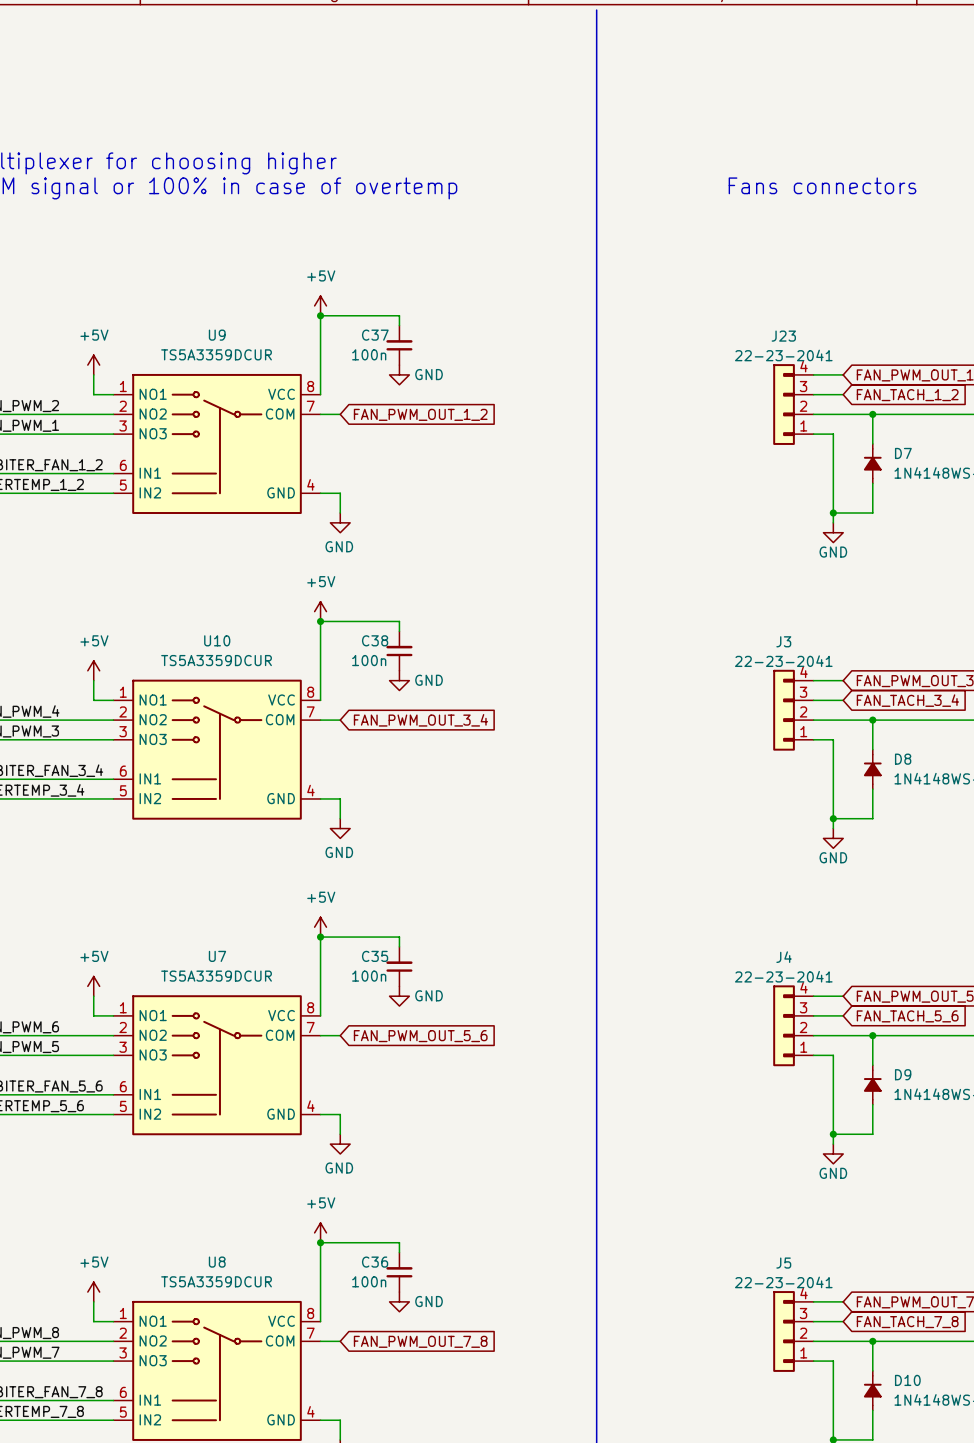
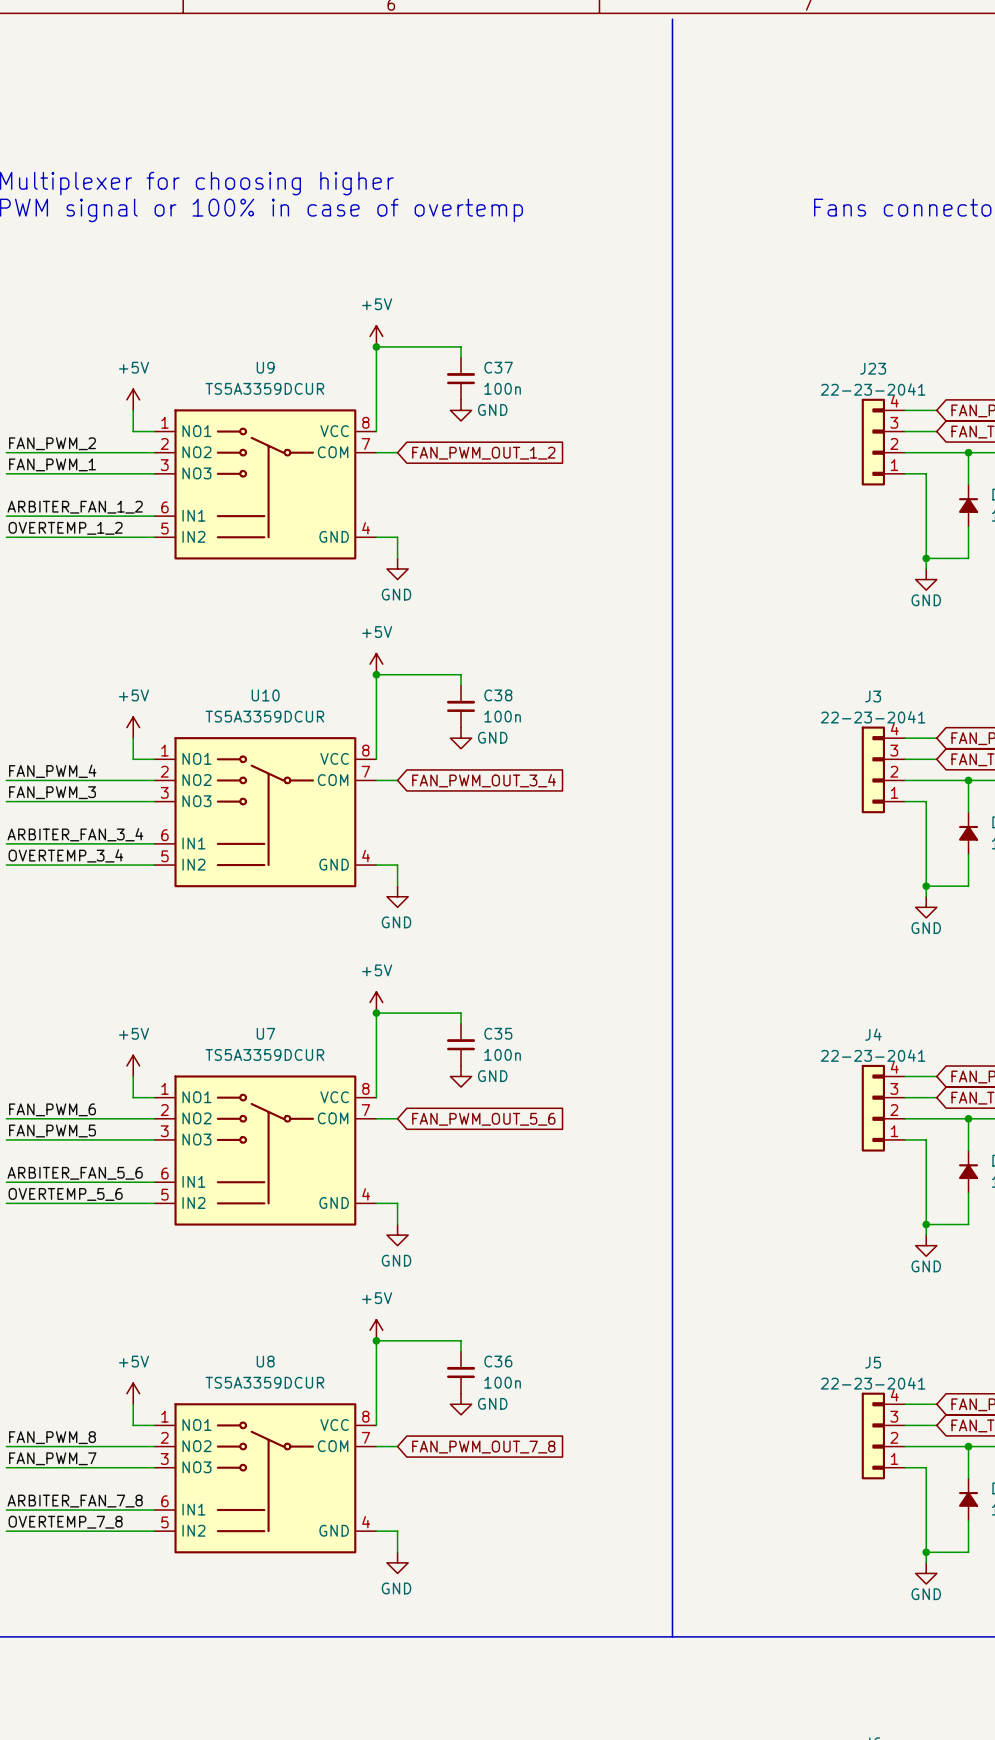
C37 name position: C37 (375, 335) -> C37 (498, 367)
C37 text position: 100n (369, 354) -> 100n (502, 388)
C38 name position: C38 (375, 640) -> C38 (498, 695)
C38 text position: 100n (369, 660) -> 100n (502, 716)
C35 name position: C35 (375, 956) -> C35 (498, 1033)
C35 text position: 100n (369, 976) -> 100n (502, 1054)
C36 name position: C36 (375, 1262) -> C36 (498, 1361)
C36 text position: 100n (369, 1281) -> 100n (502, 1382)

